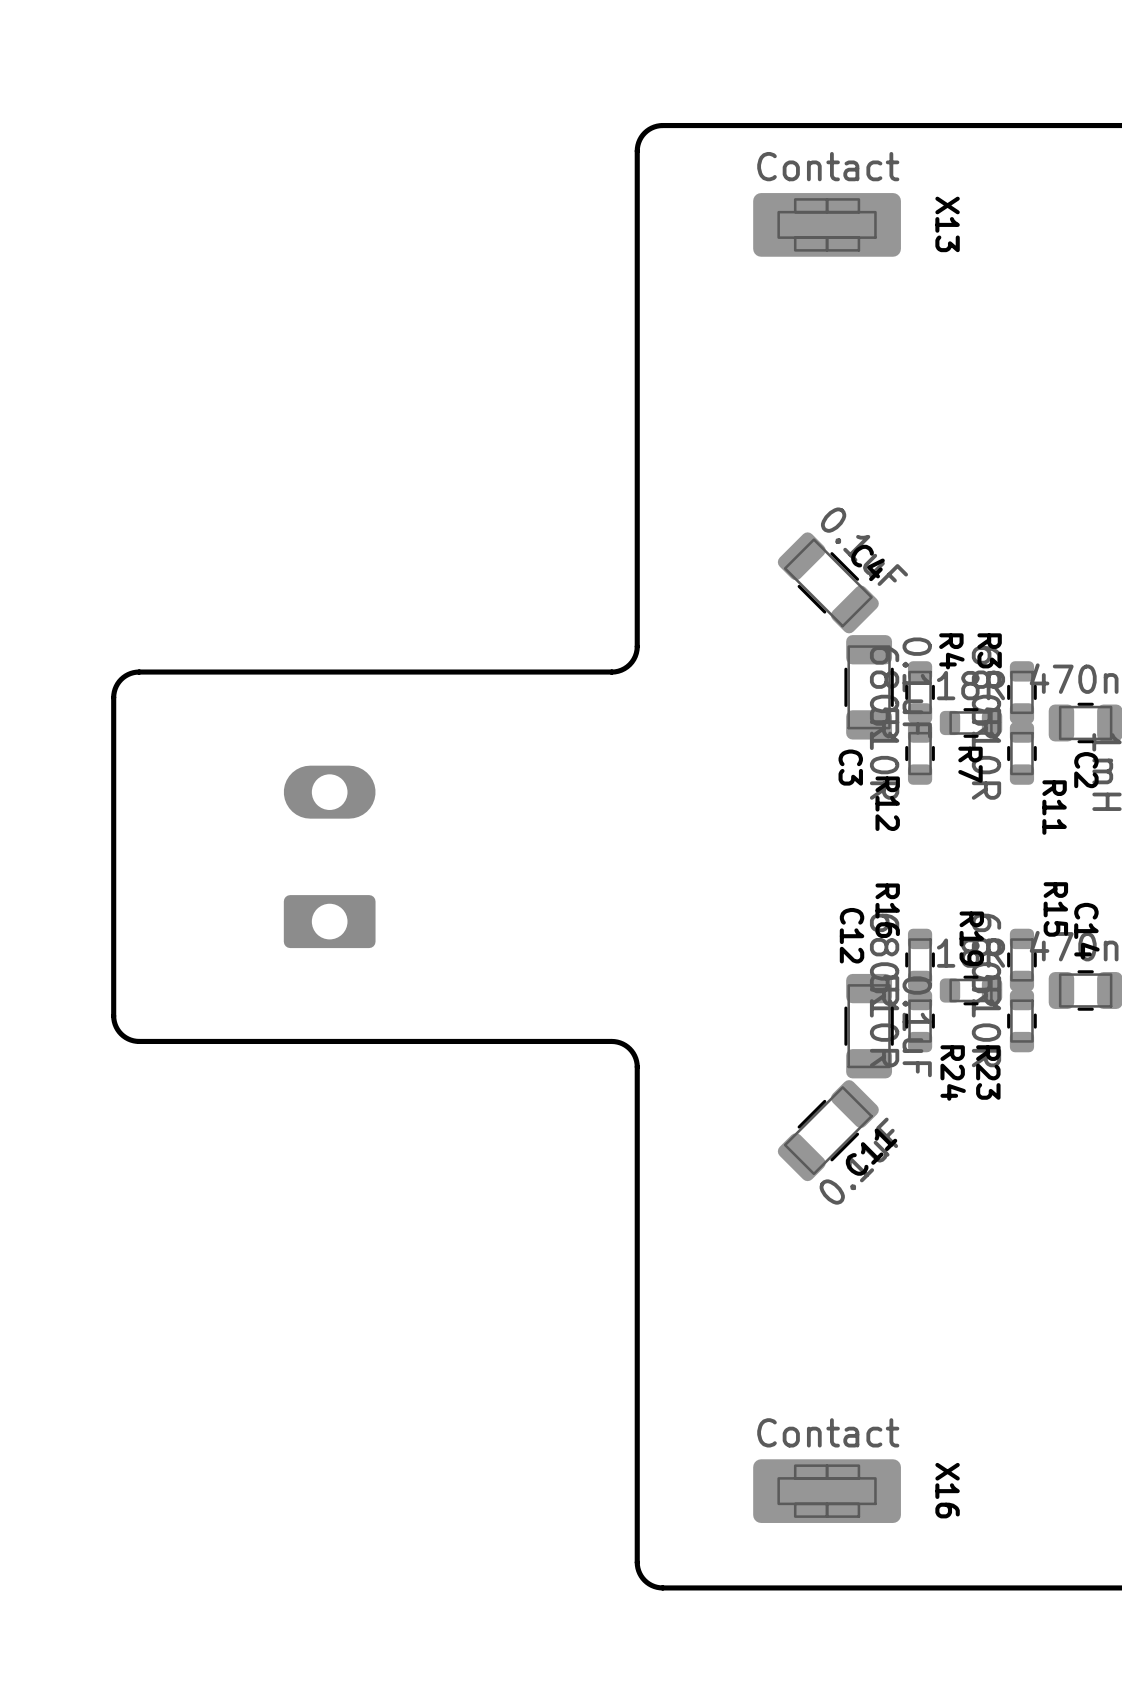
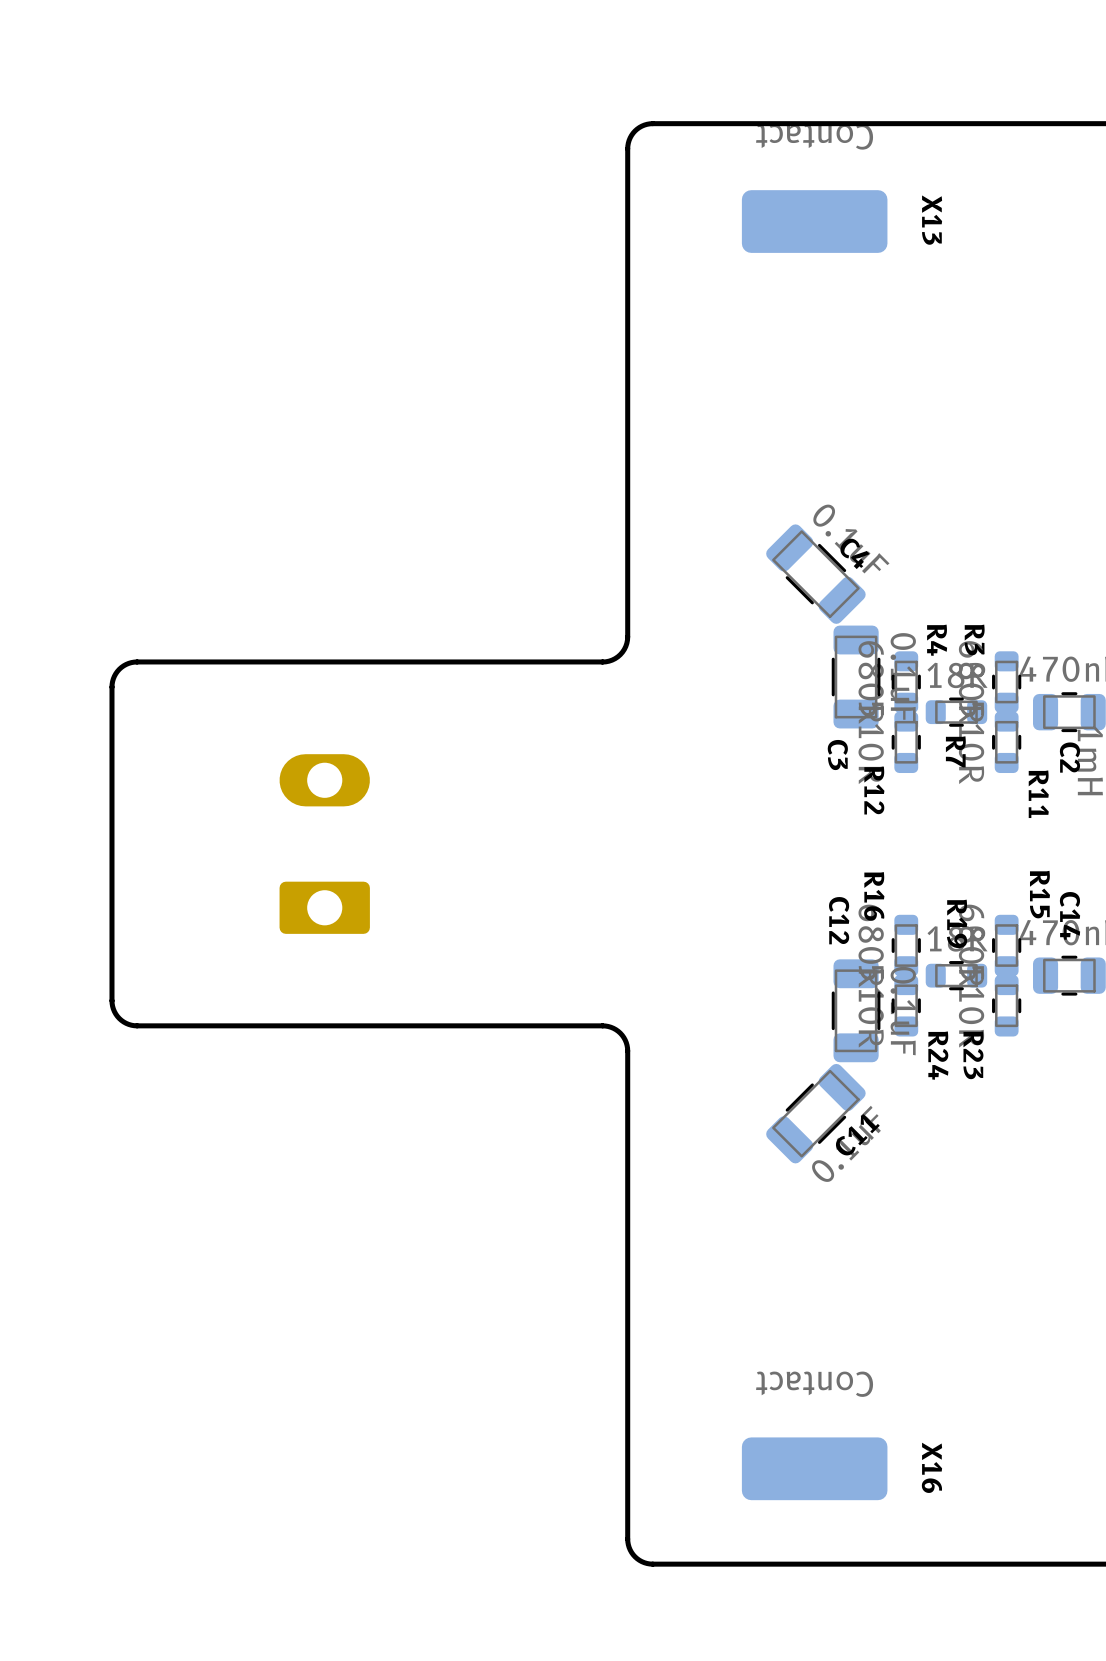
X13 footprint: [753, 193, 901, 257] -> [741, 190, 888, 253]
X16 footprint: [753, 1459, 901, 1523] -> [741, 1437, 888, 1501]

